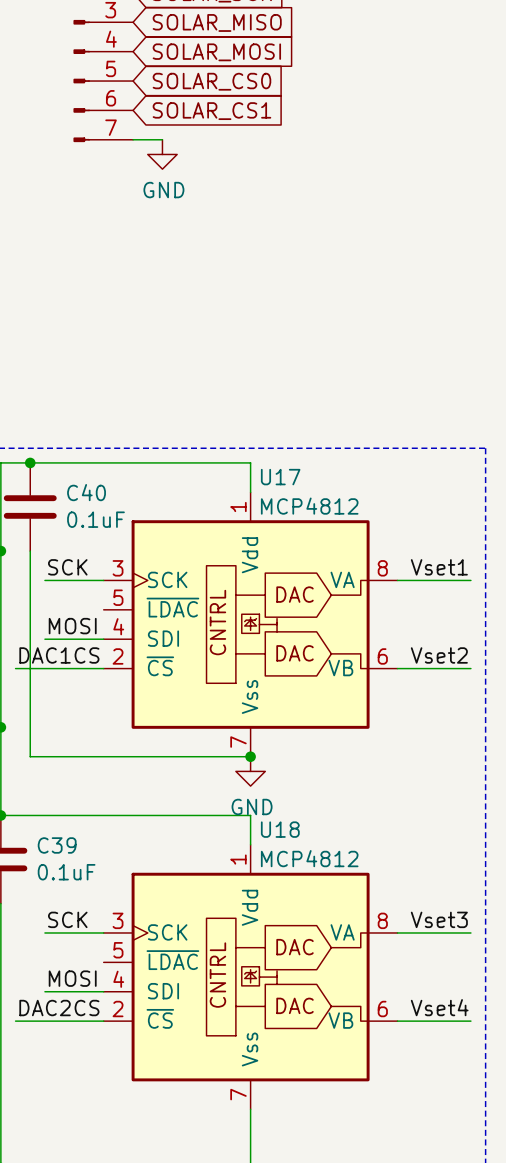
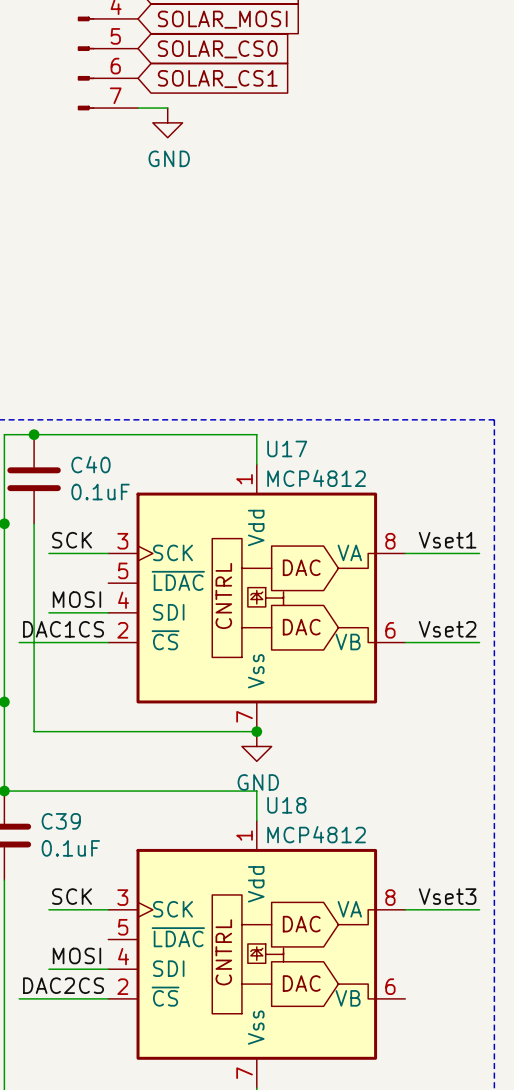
label: Vset4 (439, 1007) -> none
wire: (397, 1021) (470, 1021) -> none

